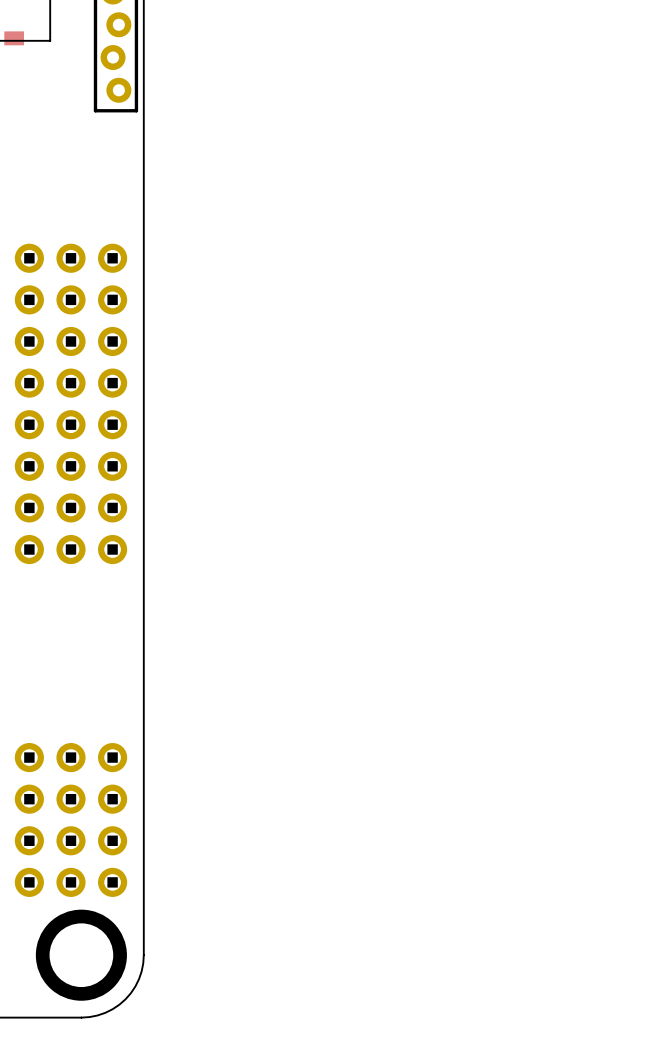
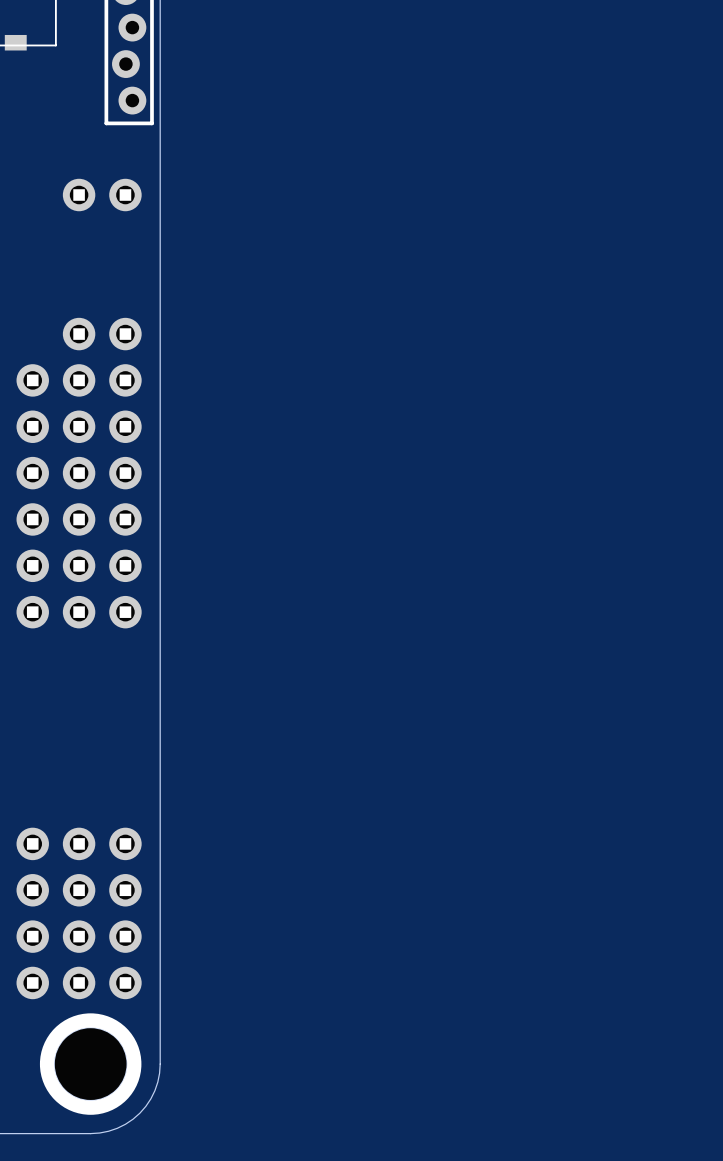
part: none -> (102, 195)
part: (29, 279) -> none
part: (70, 279) -> none
part: (112, 279) -> none

